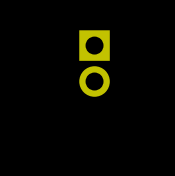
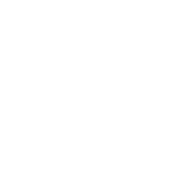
part: (94, 63) -> none

